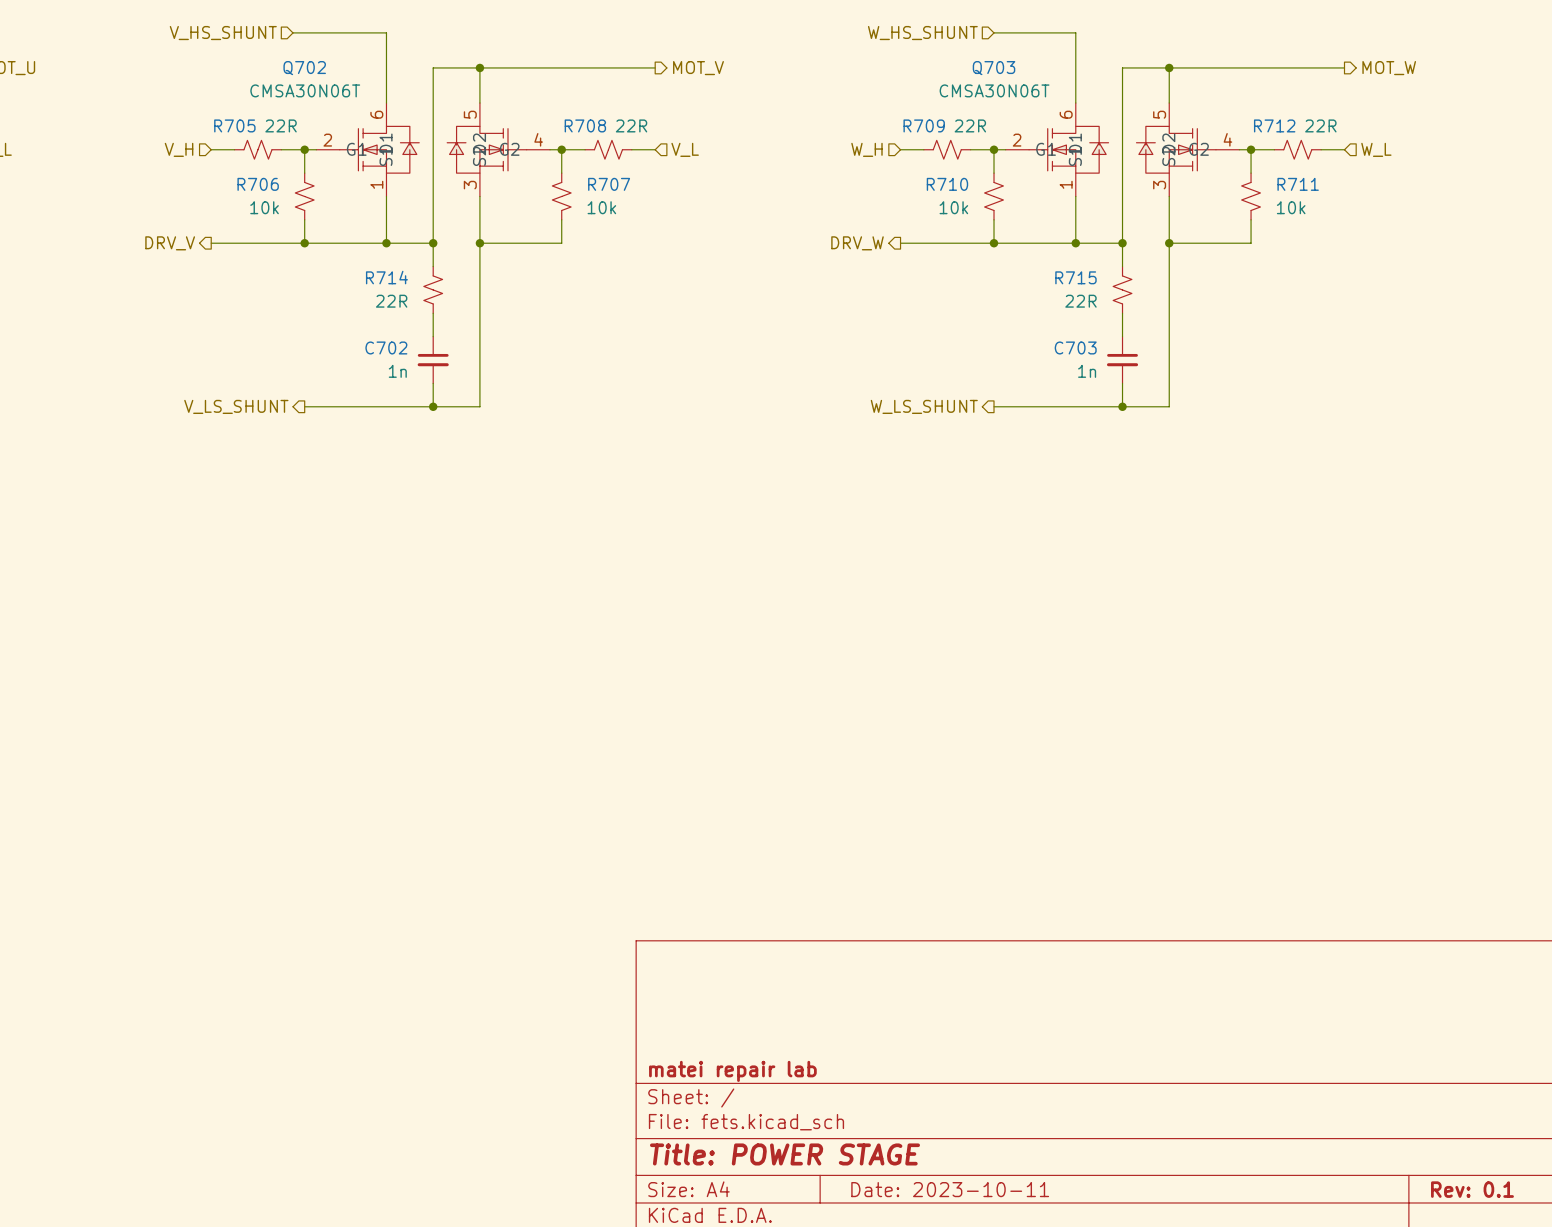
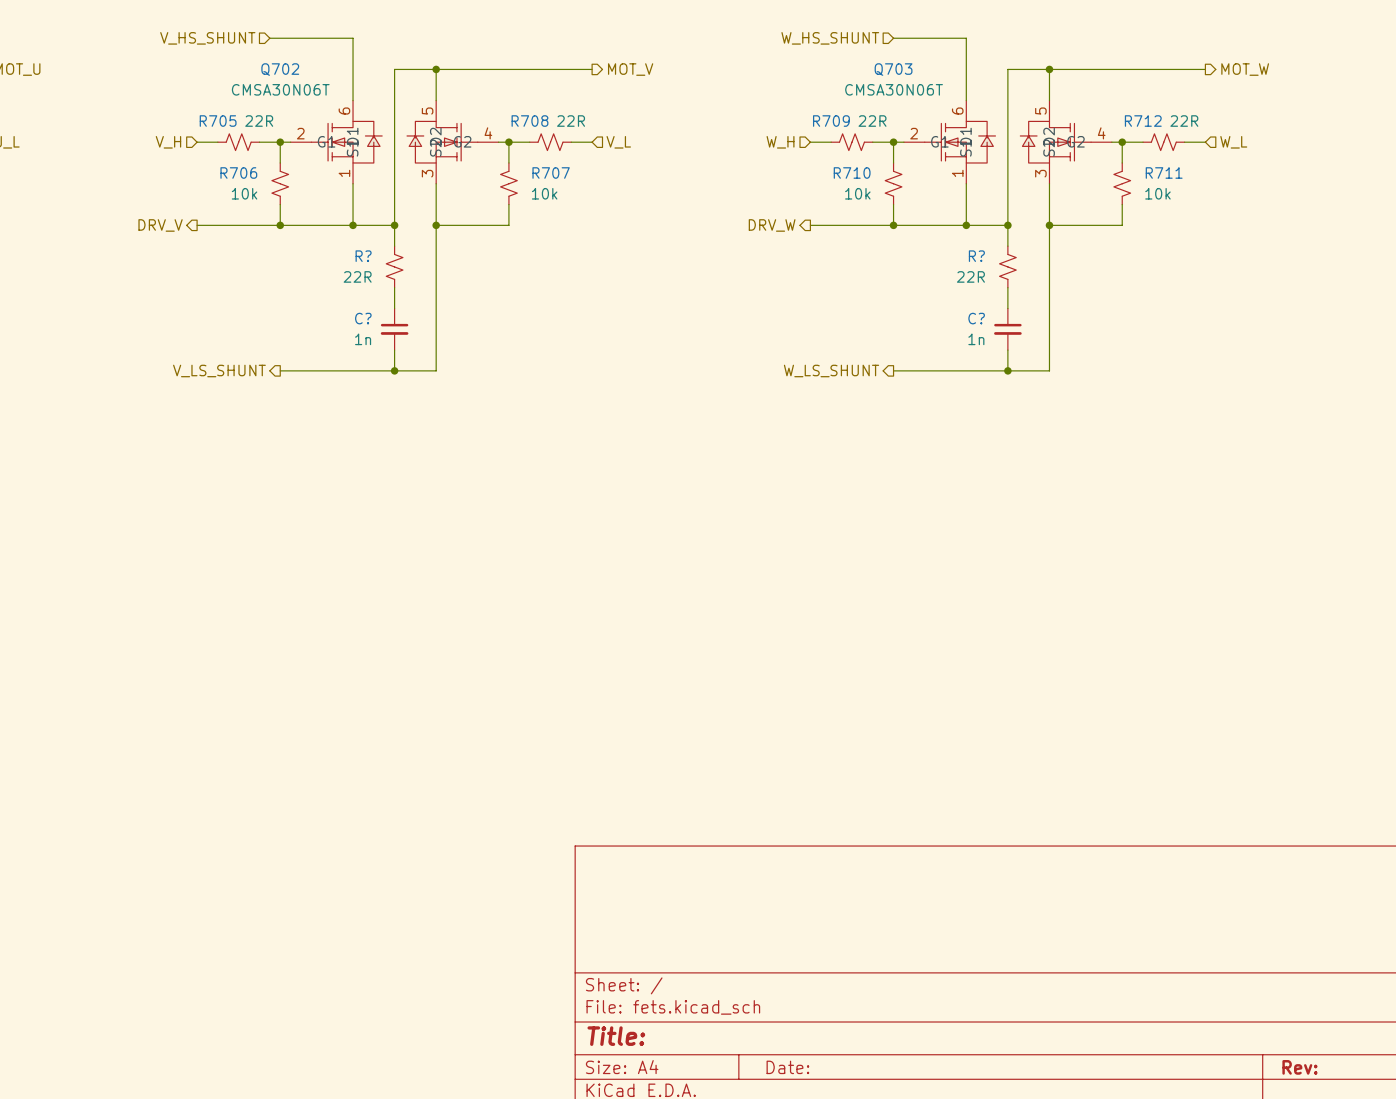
R714 name: R714 (386, 277) -> R? (363, 256)
R715 name: R715 (1075, 277) -> R? (976, 256)
C702 name: C702 (386, 347) -> C? (363, 318)
C703 name: C703 (1075, 347) -> C? (976, 318)
title block: matei repair lab (732, 1071) -> none
title block: Title: POWER STAGE (784, 1154) -> Title: (616, 1036)
title block: Date: 2023-10-11 (950, 1189) -> Date: (787, 1067)
title block: Rev: 0.1 (1472, 1189) -> Rev: (1299, 1067)

